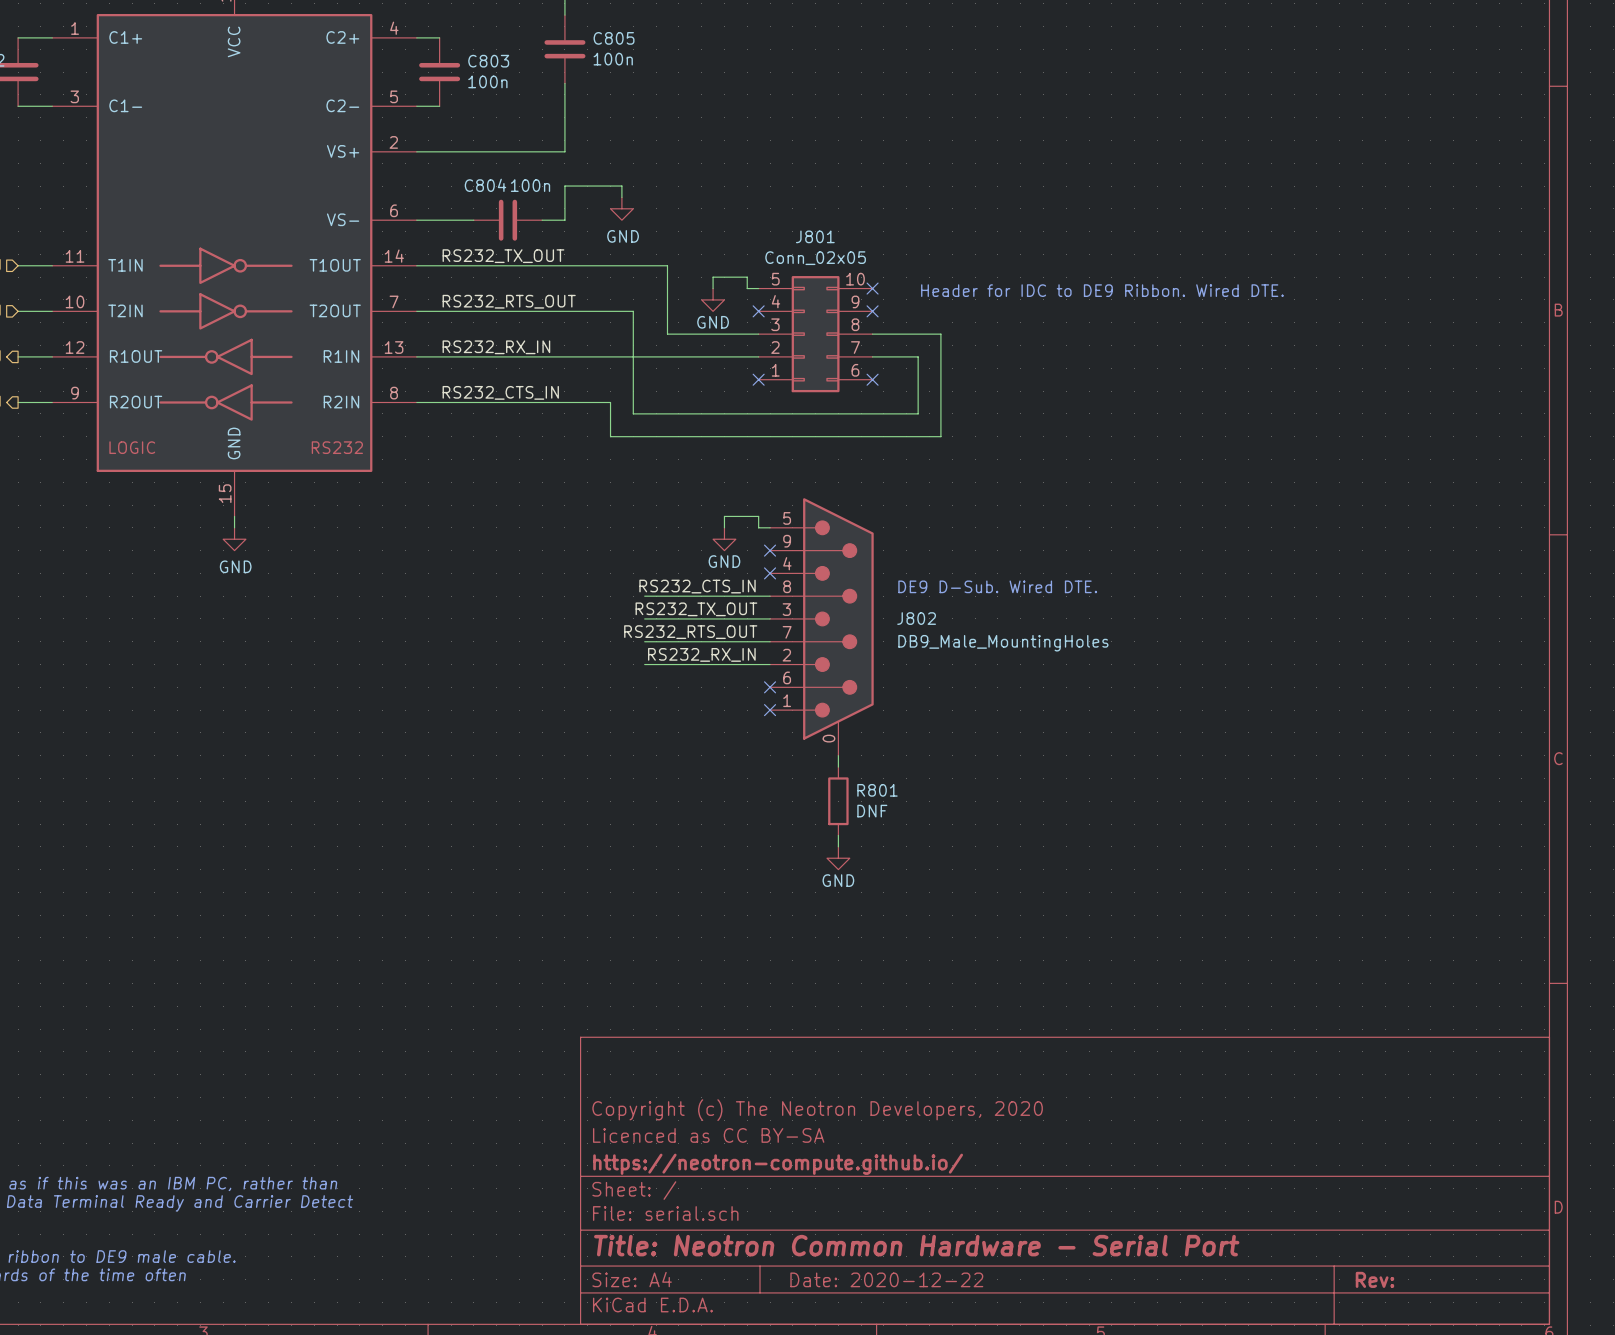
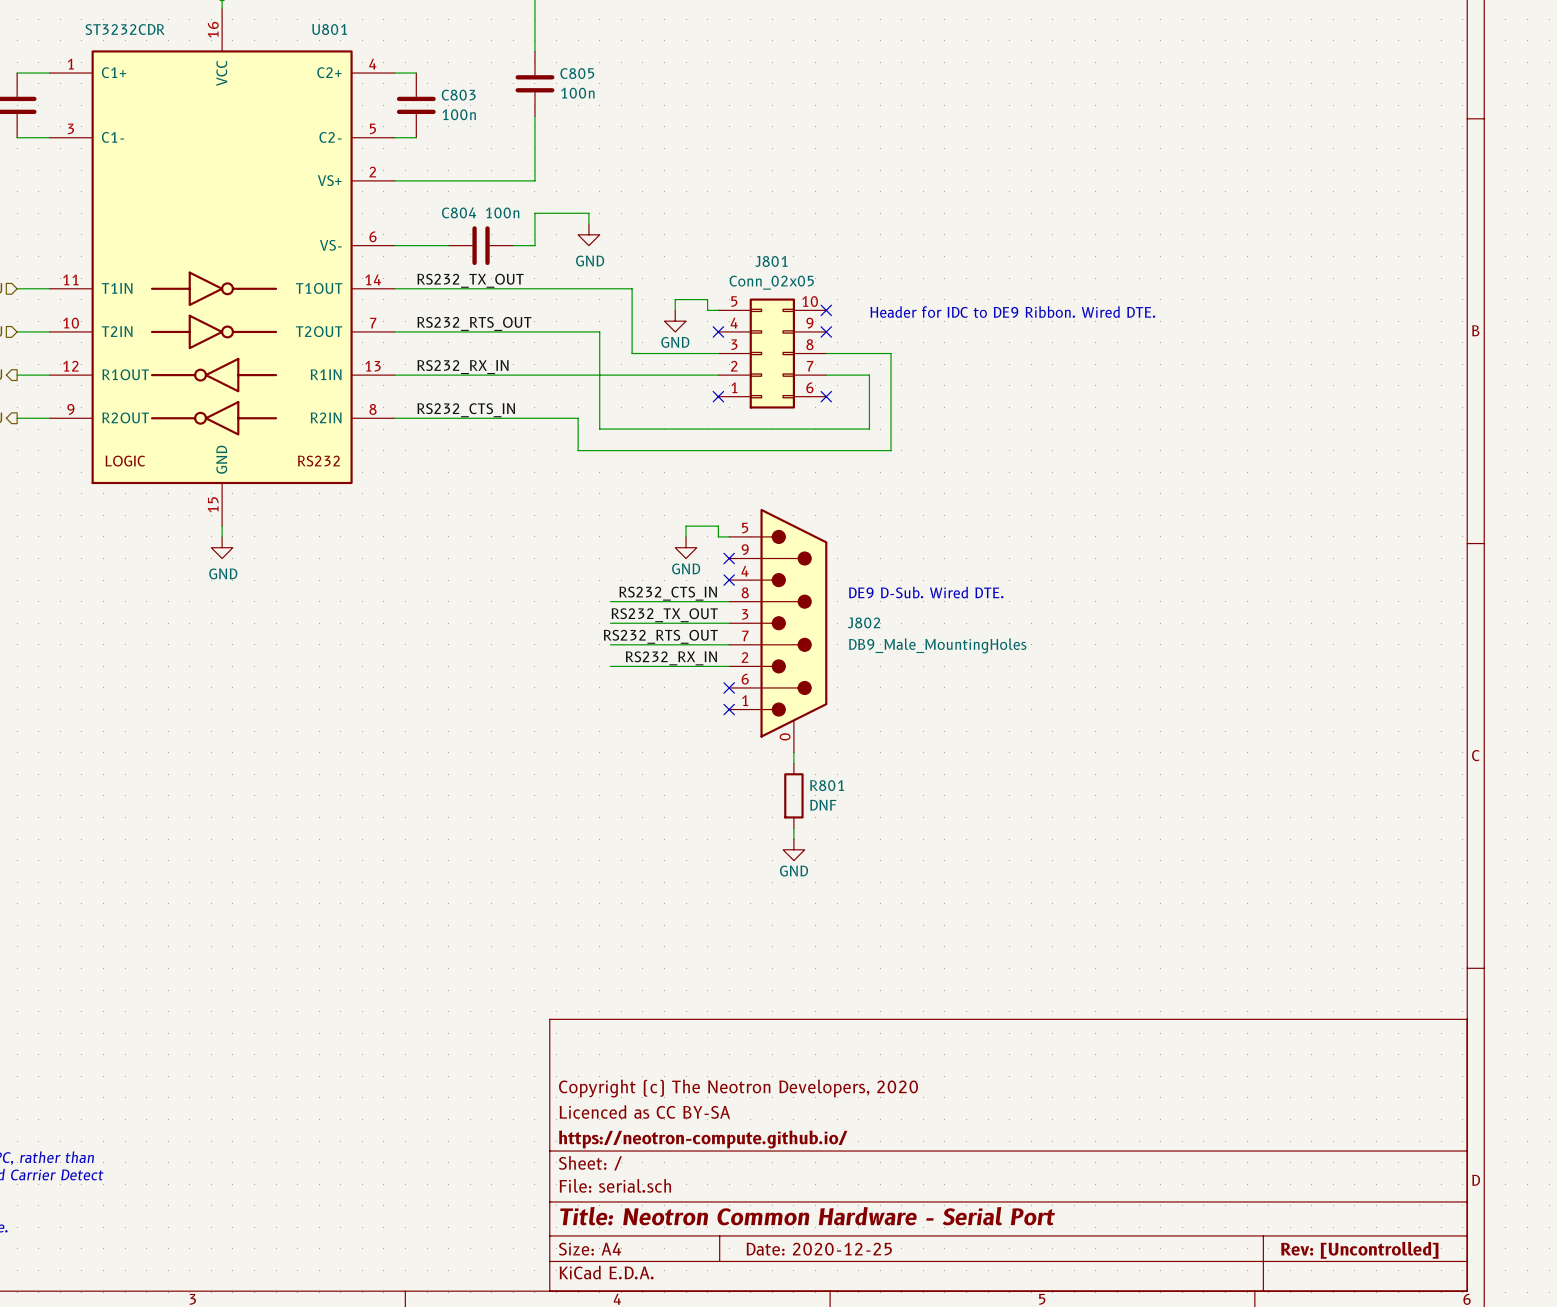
title block: Date: 2020-12-22 (886, 1279) -> Date: 2020-12-25 (819, 1249)
title block: Rev: (1375, 1279) -> Rev: [Uncontrolled] (1359, 1250)

